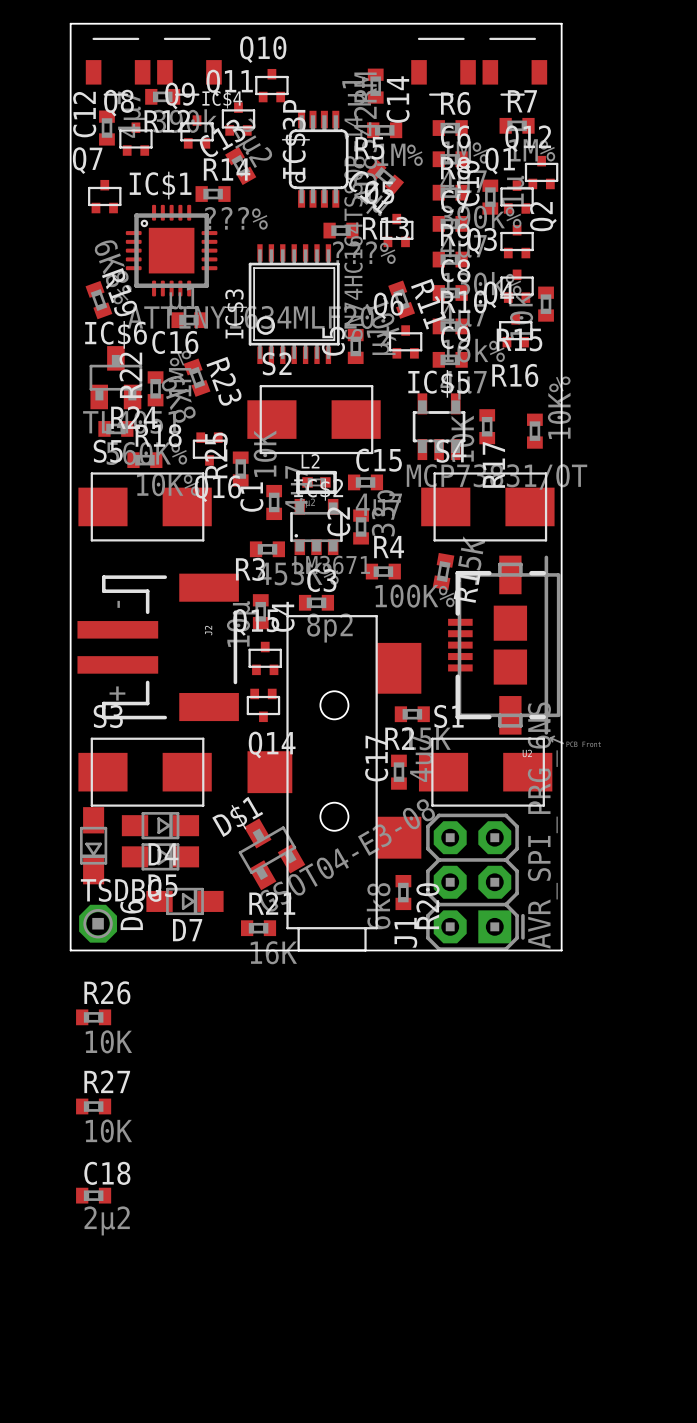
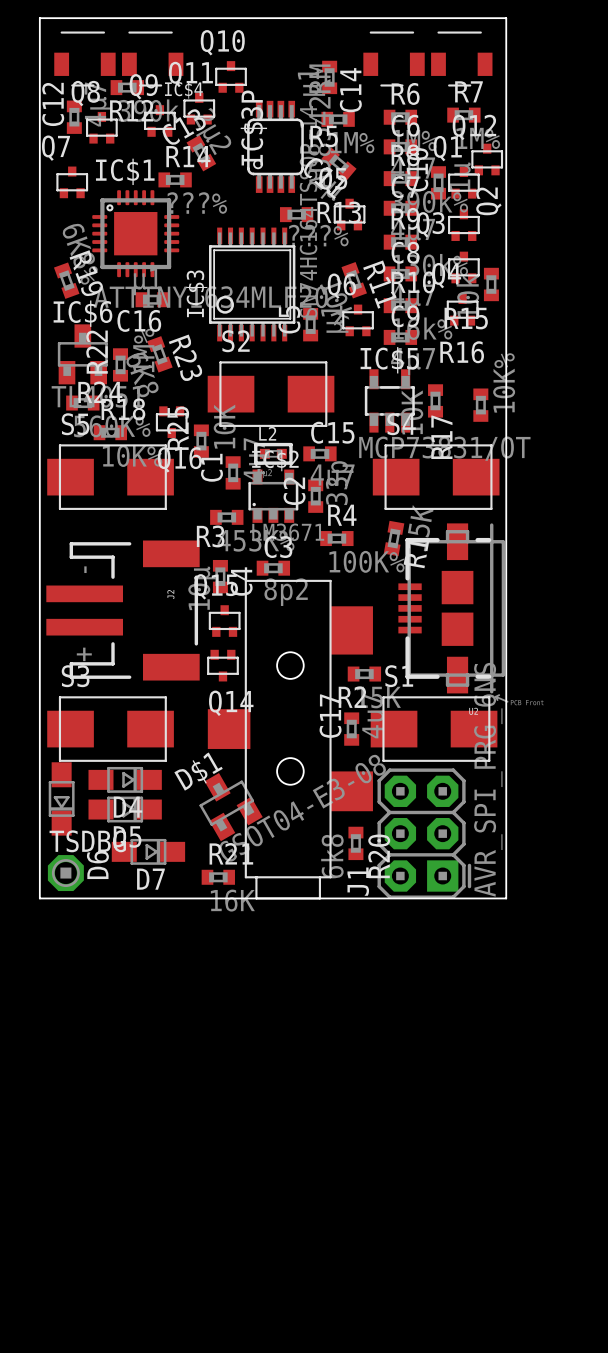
R26: 10K (93, 1017) -> none
R27: 10K (93, 1106) -> none
C18: 2µ2 (93, 1195) -> none

